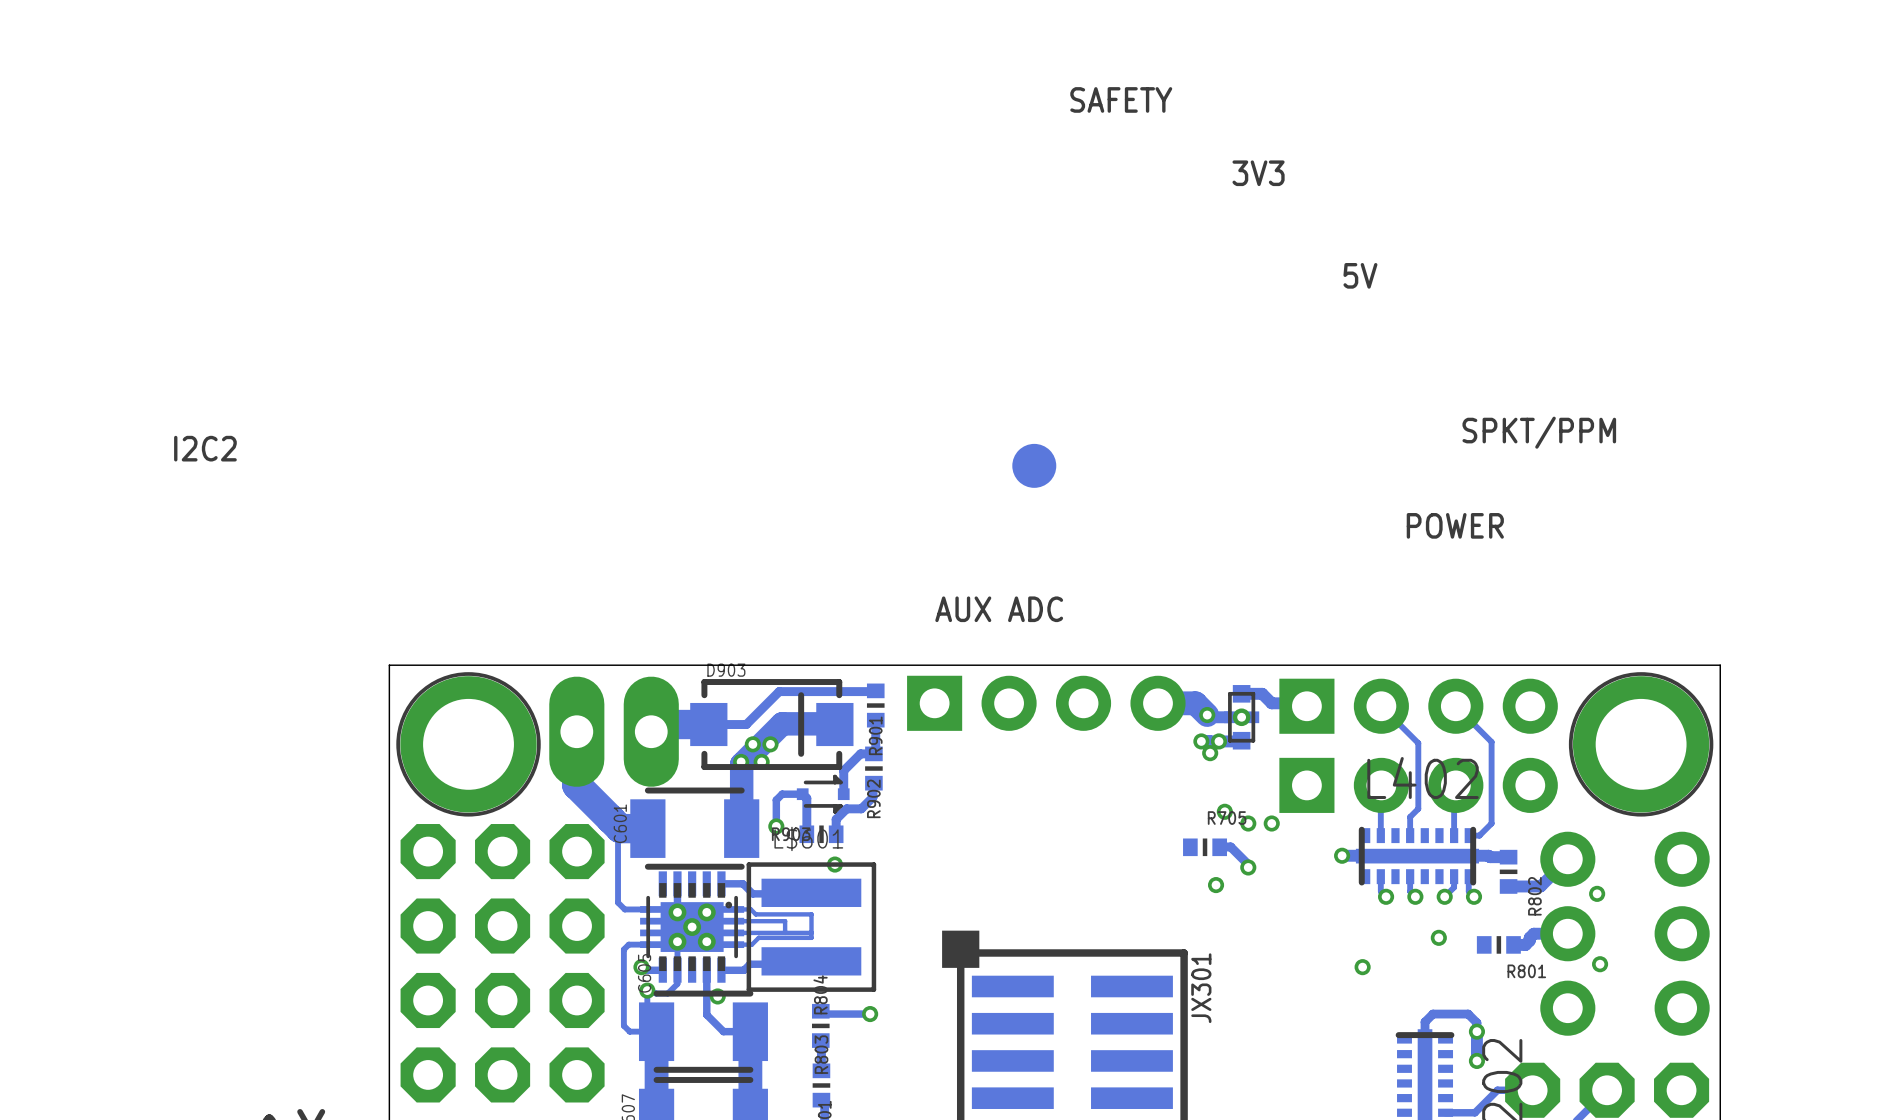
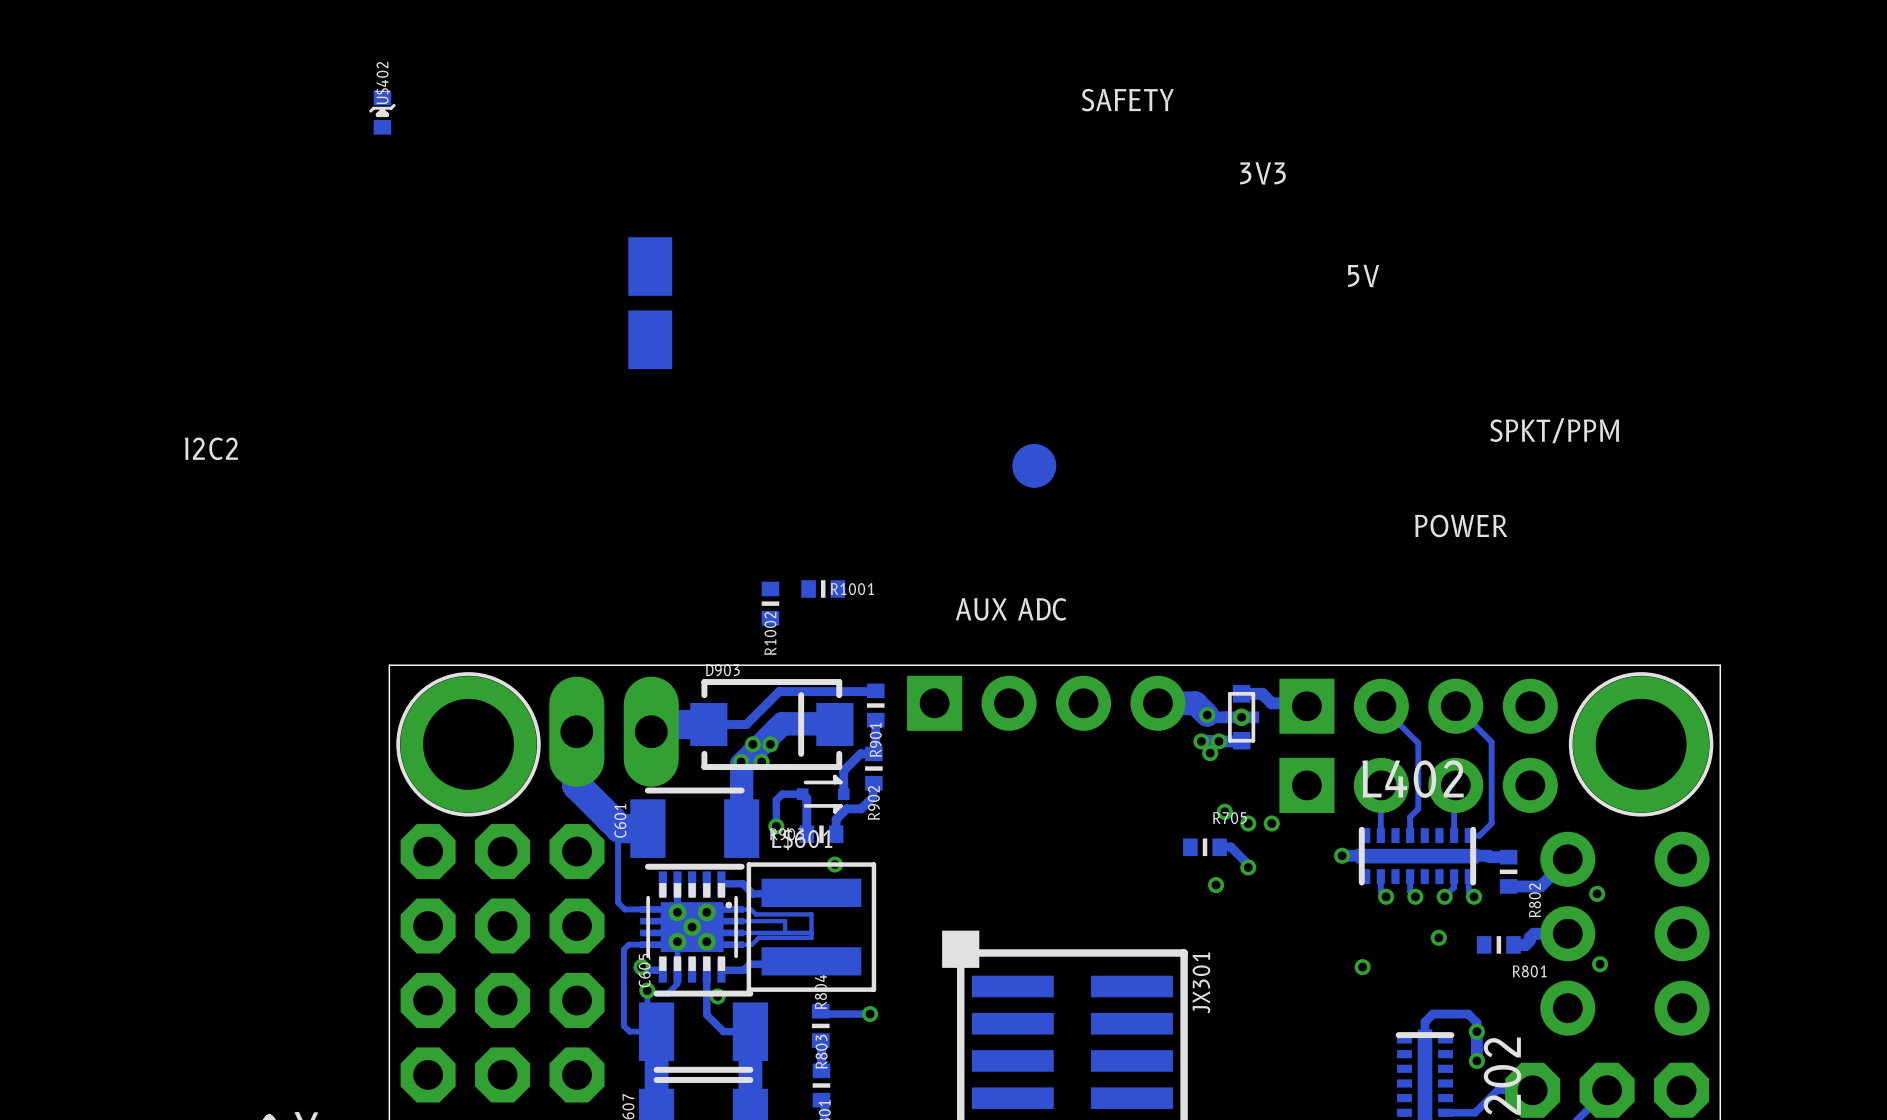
U$402: none -> (382, 112)
part: none -> (650, 266)
part: none -> (650, 339)
R1001: none -> (823, 588)
R1002: none -> (770, 603)

